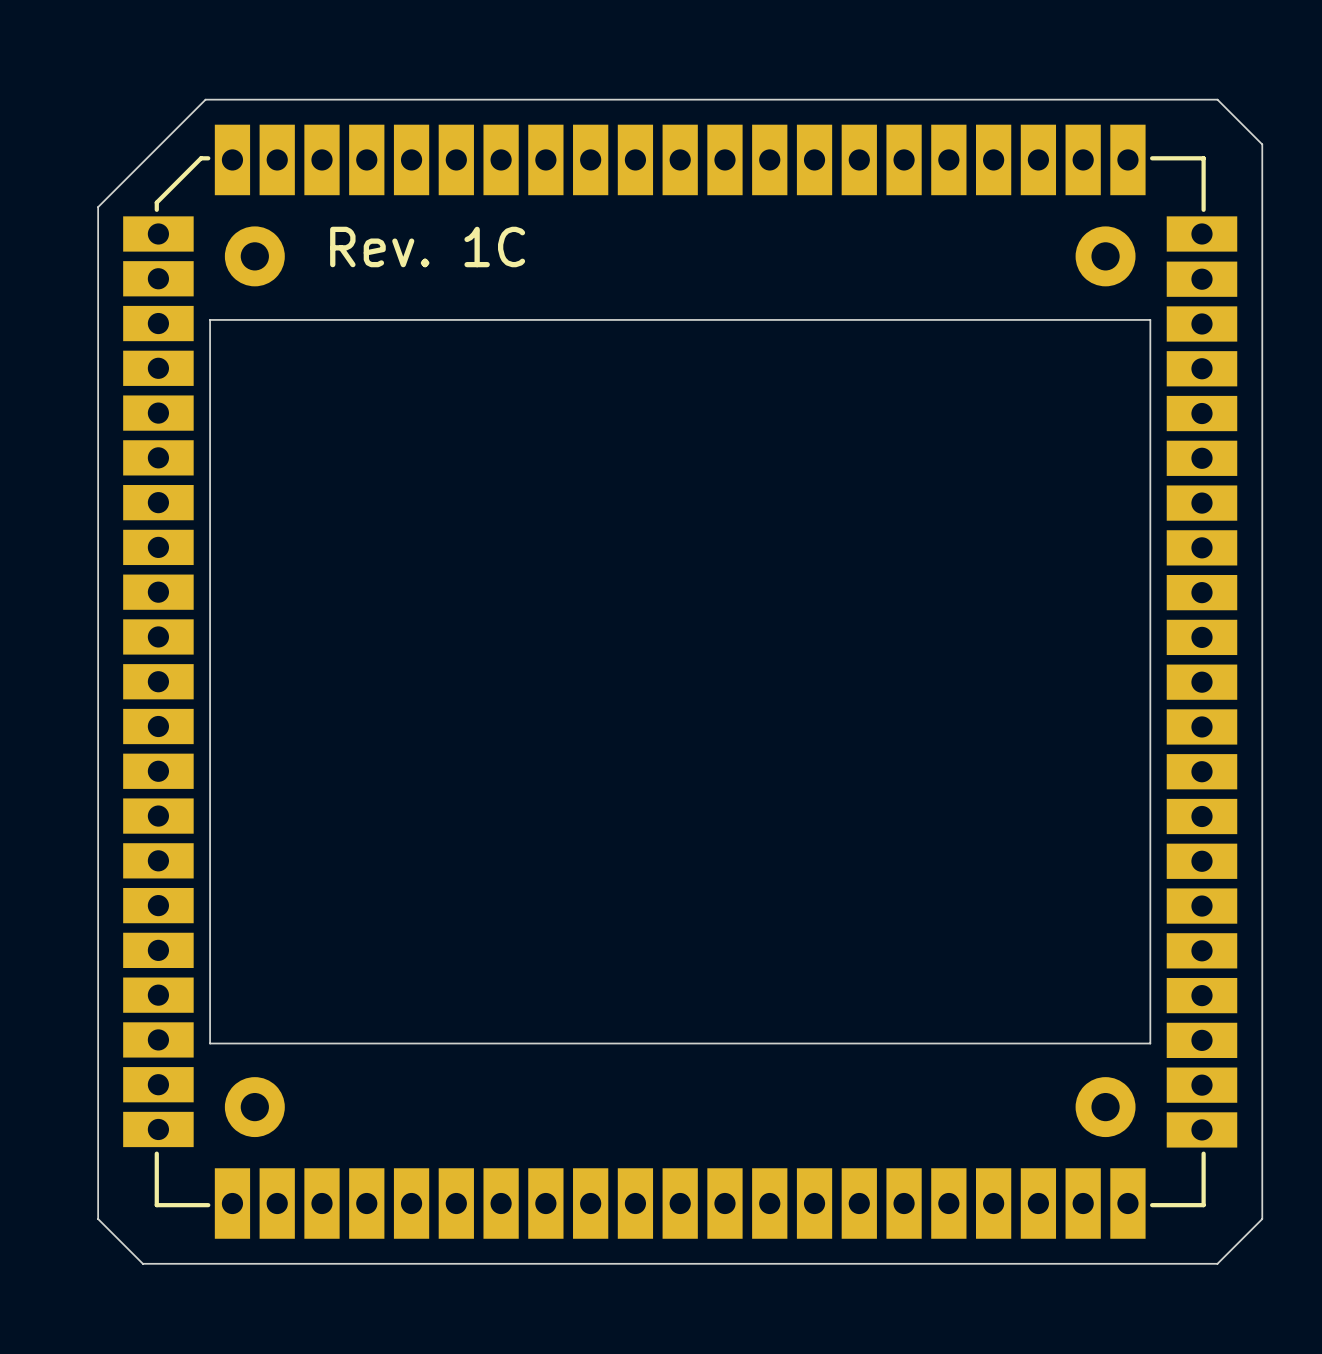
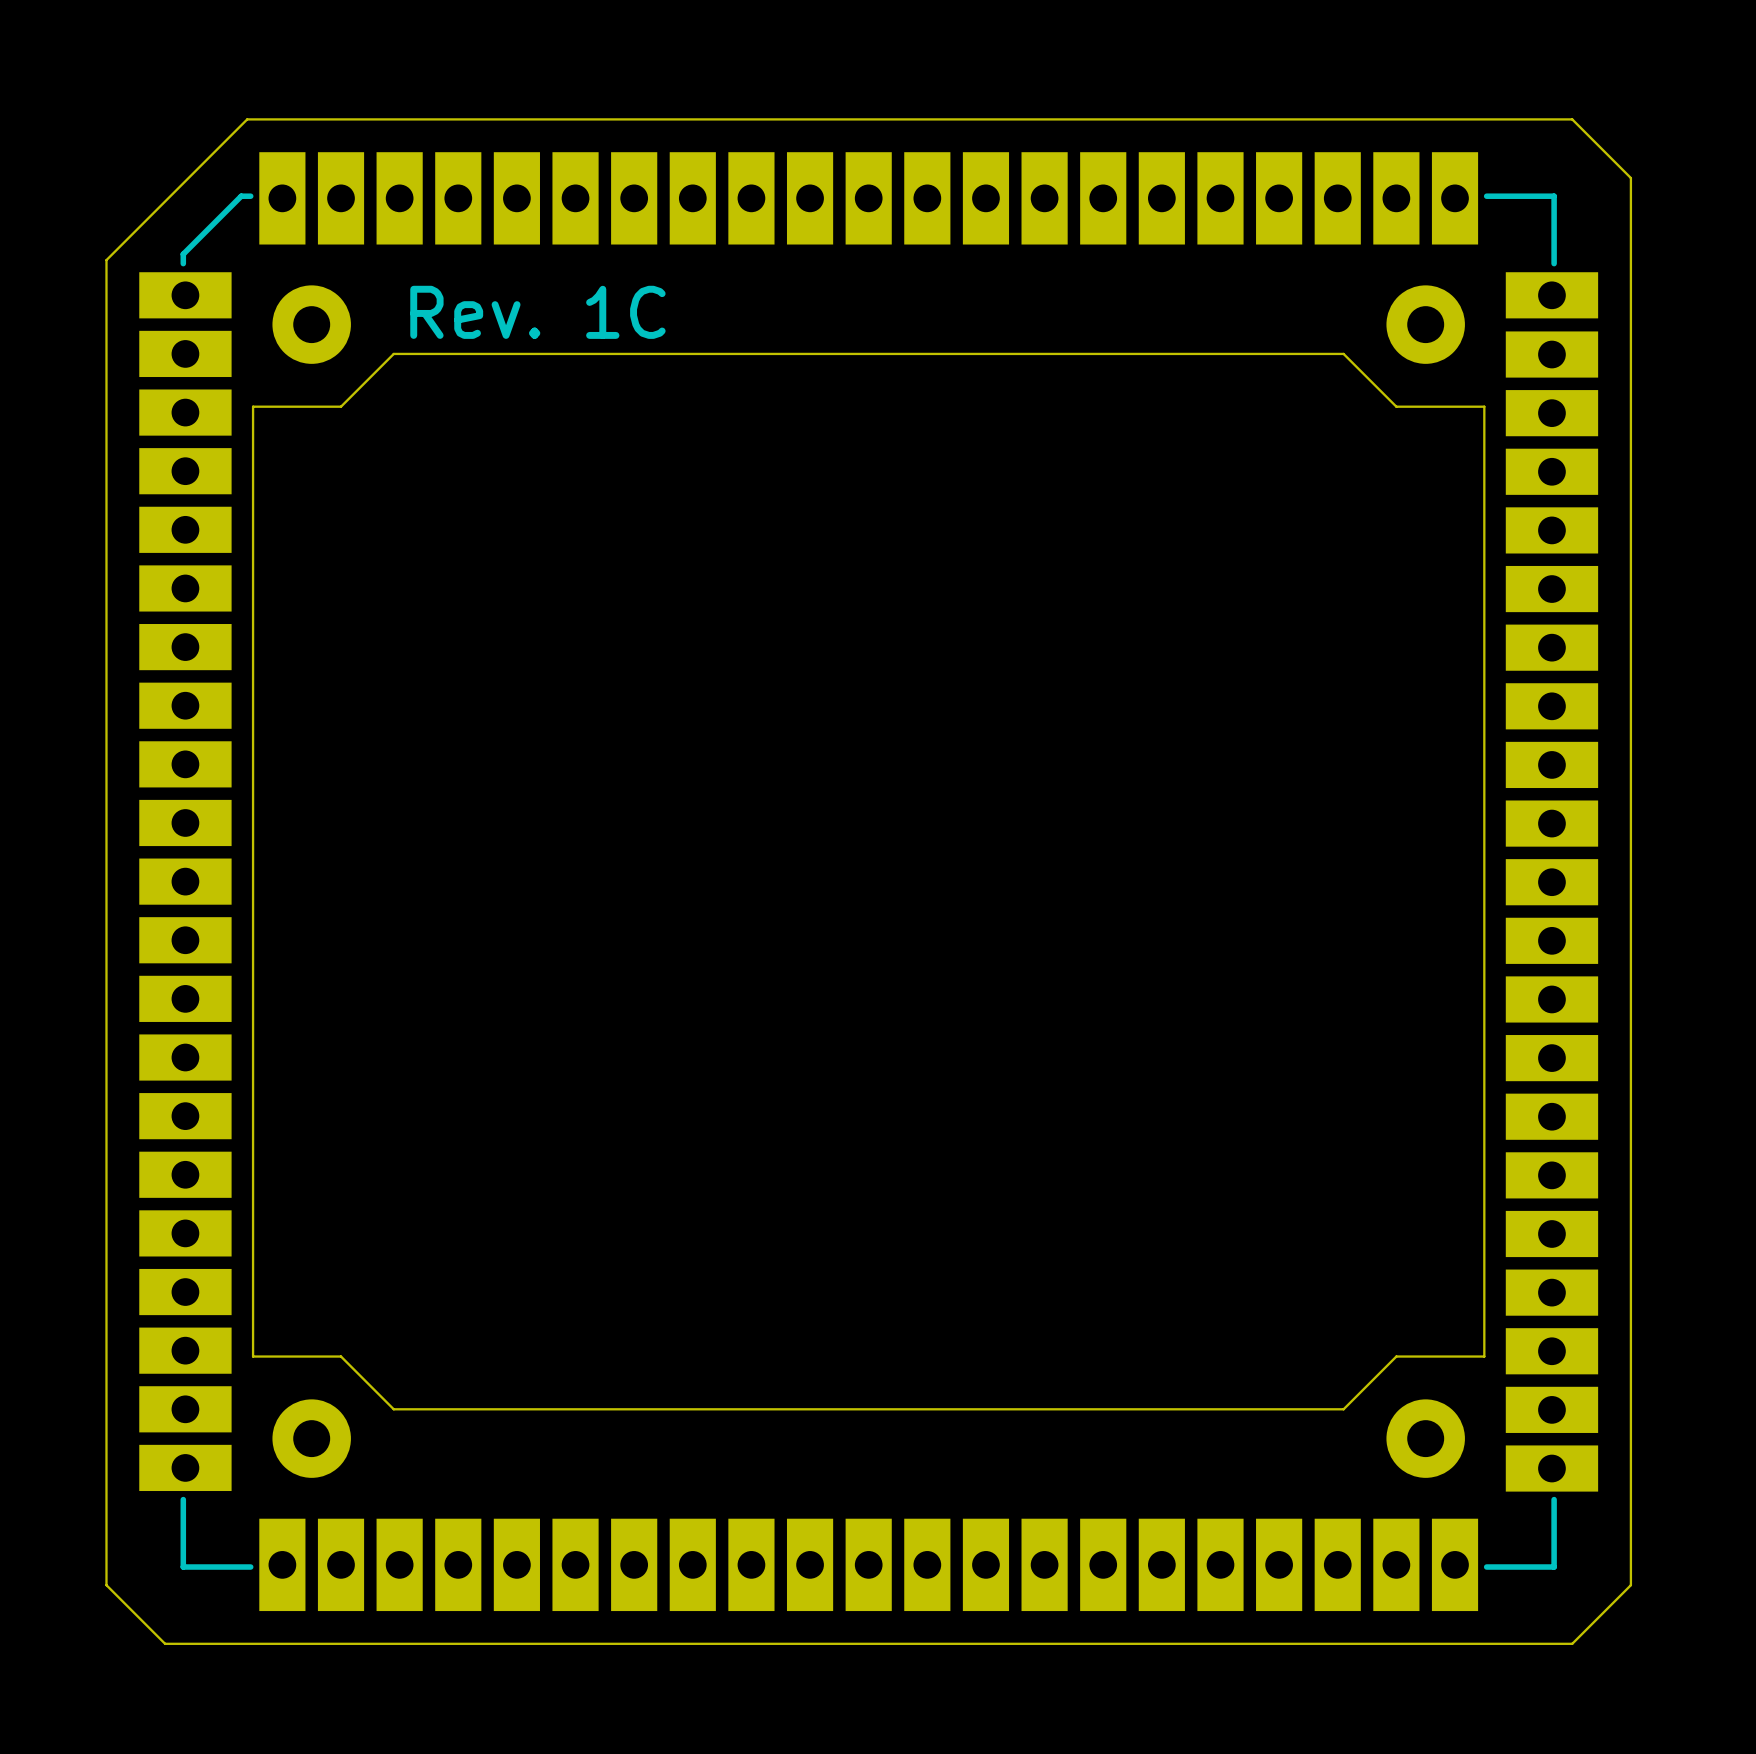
board edge: (210, 319) (1150, 319) -> (253, 407) (341, 406) (393, 353) (1343, 353) (1396, 406) (1484, 407)
board edge: (210, 1043) (1150, 1043) -> (253, 1355) (341, 1356) (393, 1409) (1343, 1409) (1396, 1356) (1484, 1355)

